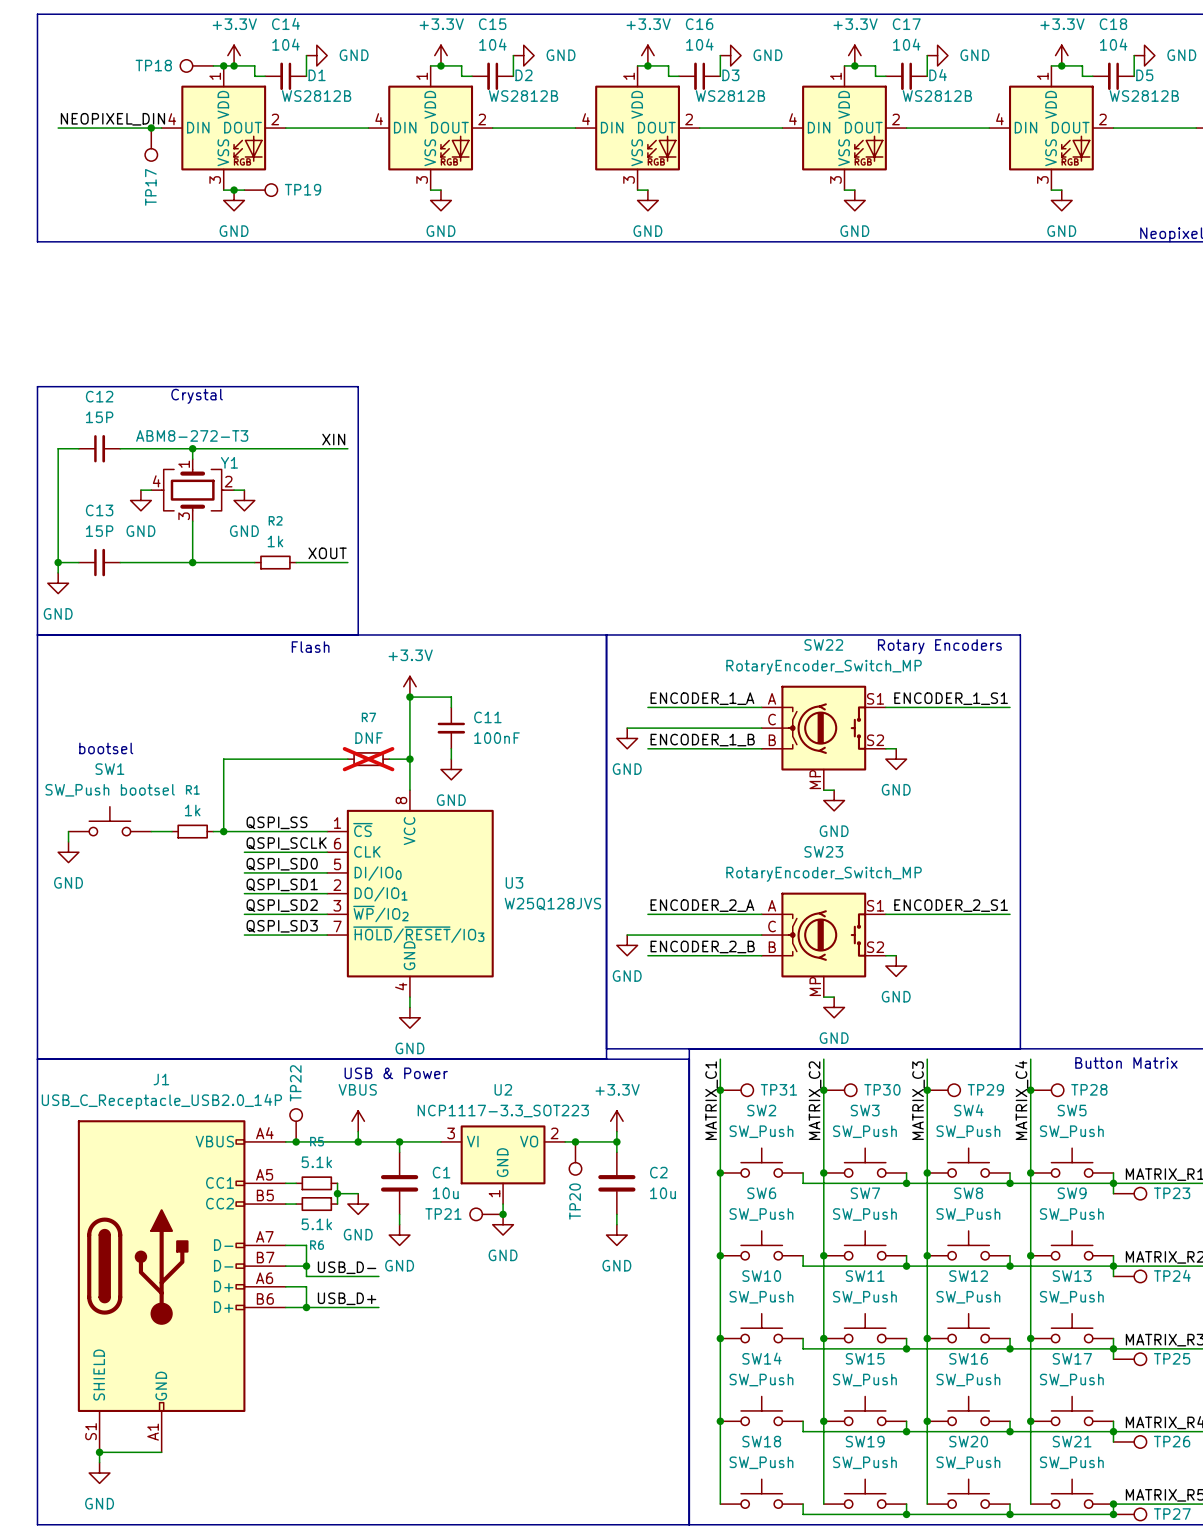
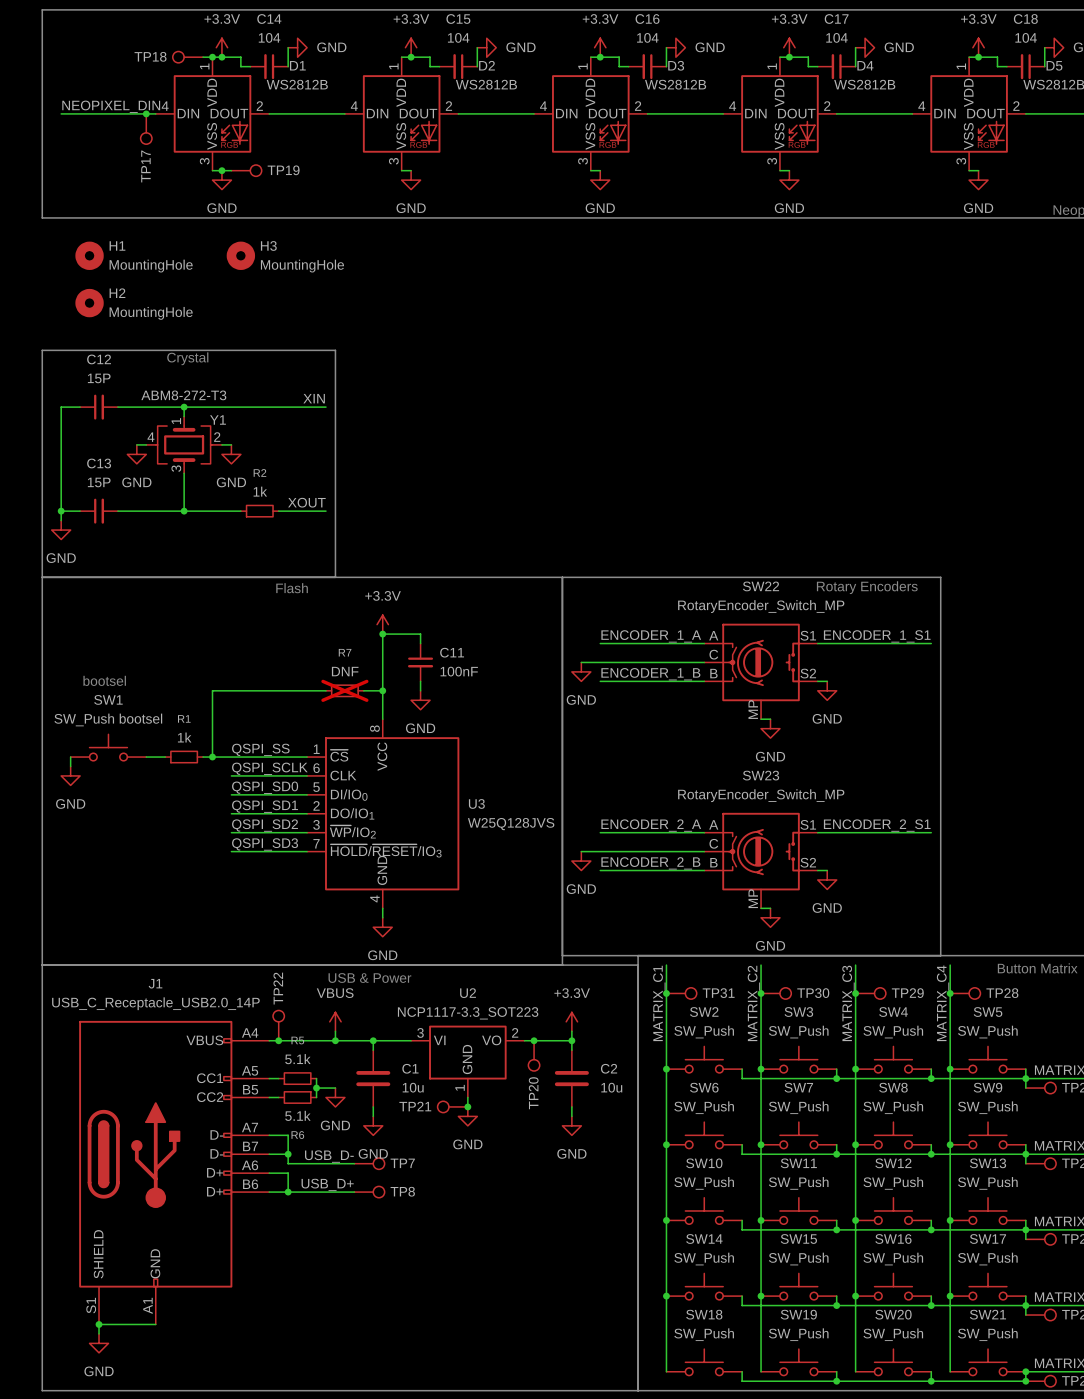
H1: none -> MountingHole (89, 255)
H3: none -> MountingHole (240, 255)
H2: none -> MountingHole (89, 303)
TP7: none -> (369, 1163)
TP8: none -> (369, 1192)

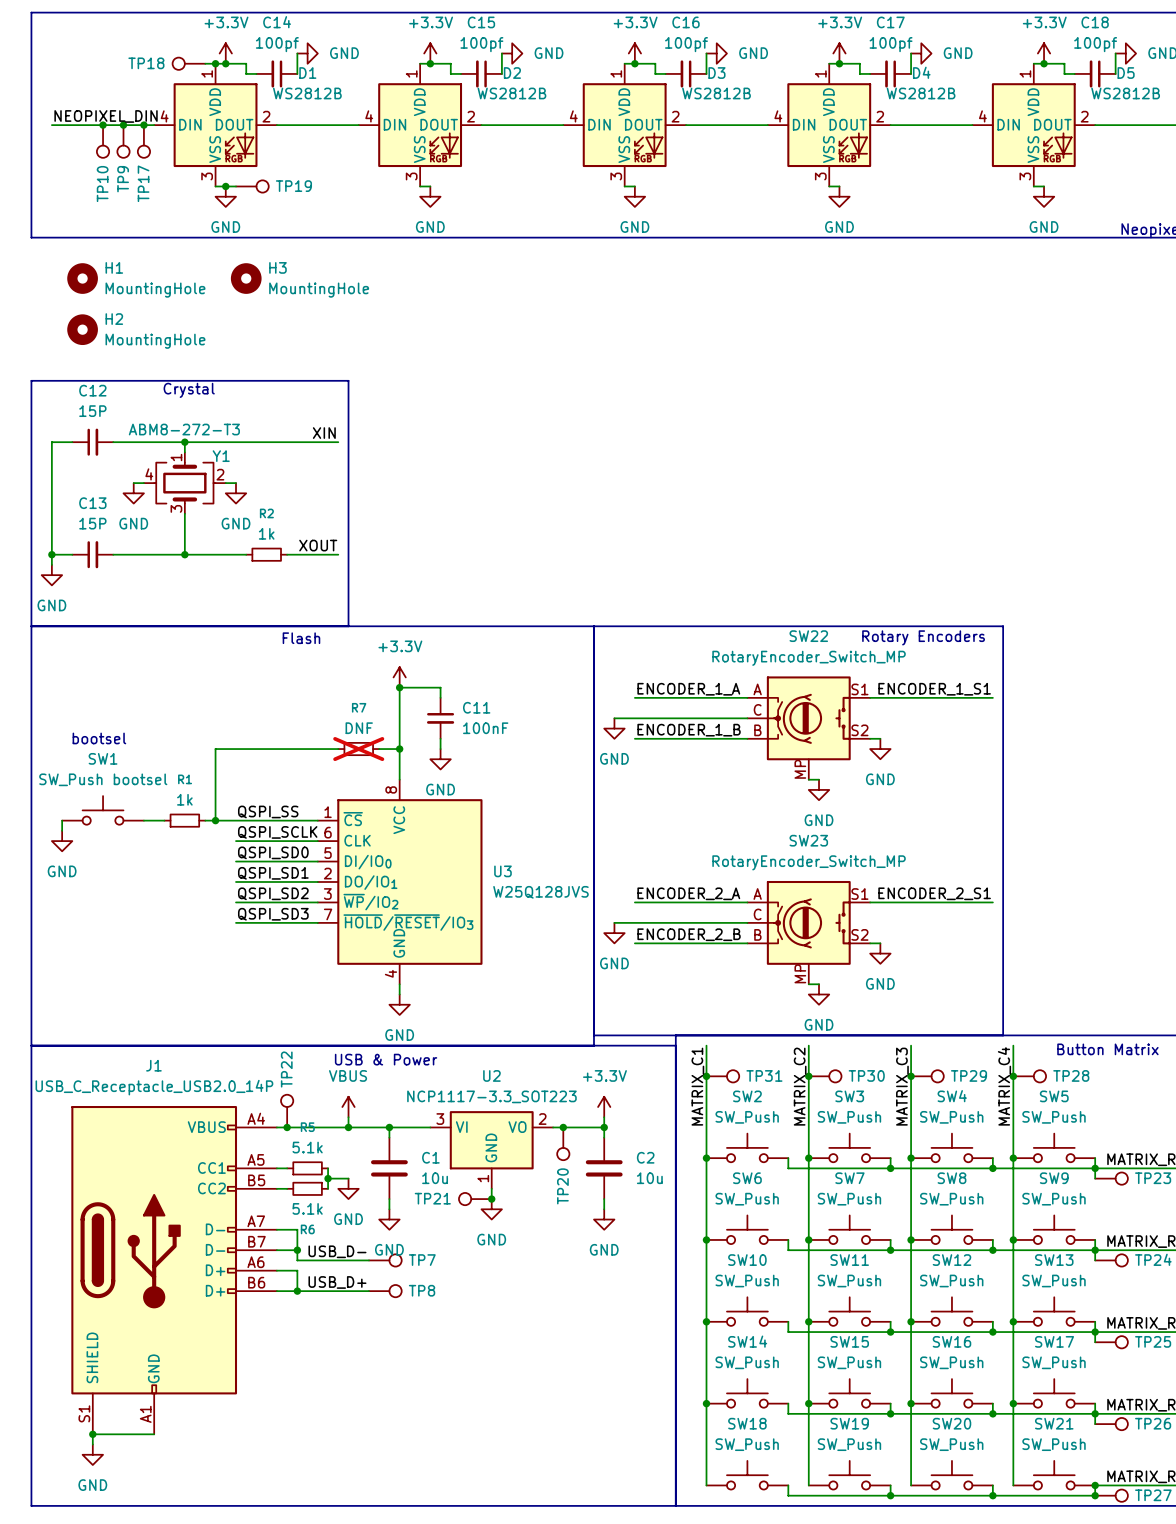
C14 value: 104 (269, 37) -> 100pf (277, 44)
C15 value: 104 (458, 37) -> 100pf (481, 44)
C16 value: 104 (647, 37) -> 100pf (686, 44)
C17 value: 104 (836, 37) -> 100pf (891, 44)
C18 value: 104 (1026, 37) -> 100pf (1095, 44)
junction: none -> (103, 125)
junction: none -> (123, 125)
TP10: none -> (103, 141)
TP9: none -> (123, 141)

